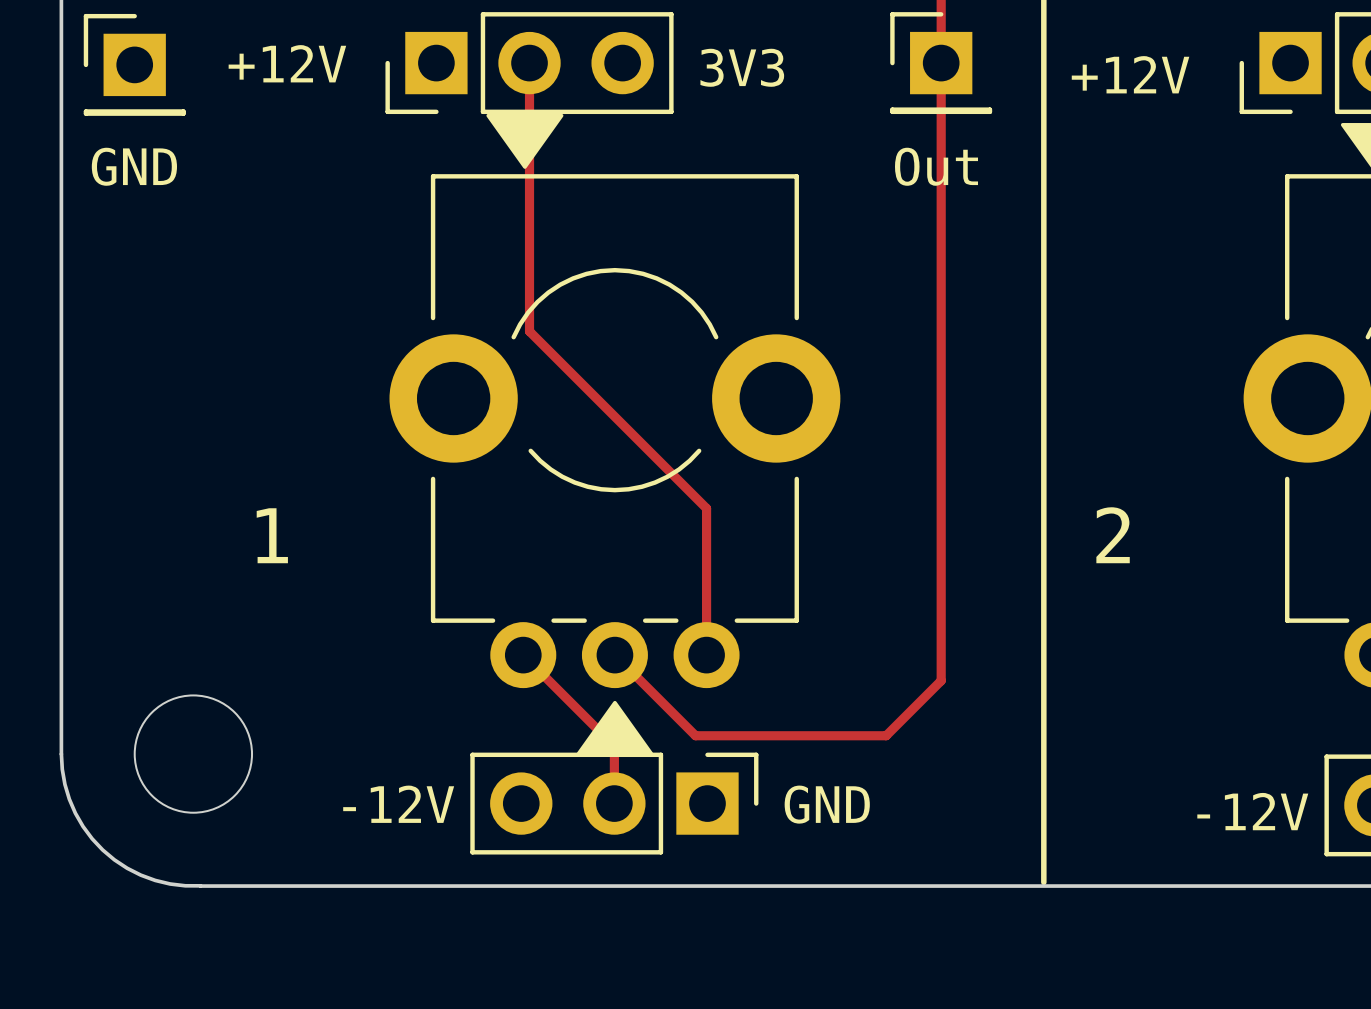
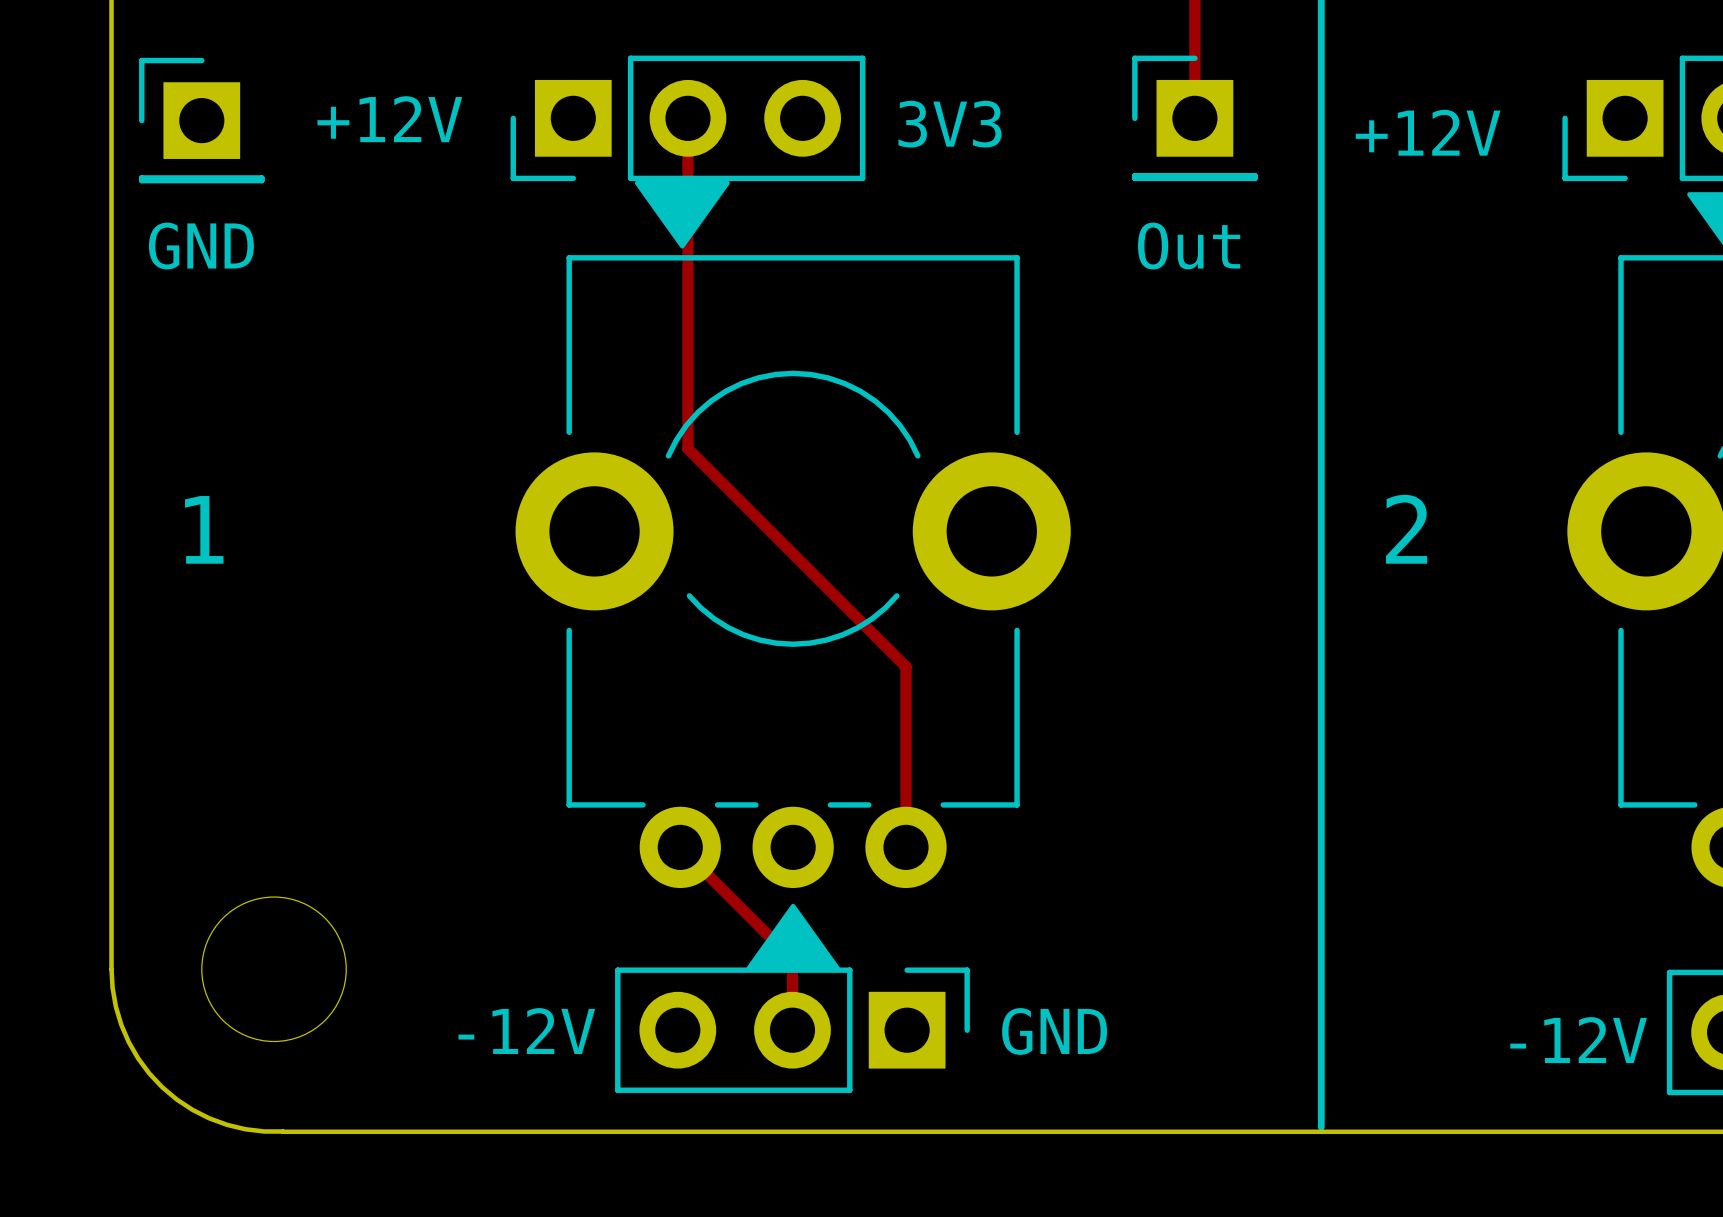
track: (941, 72) (941, 680) (886, 735) (695, 735) (614, 655) -> none
text position: 1 (272, 535) -> 1 (204, 529)
text position: 2 (1113, 535) -> 2 (1406, 529)

